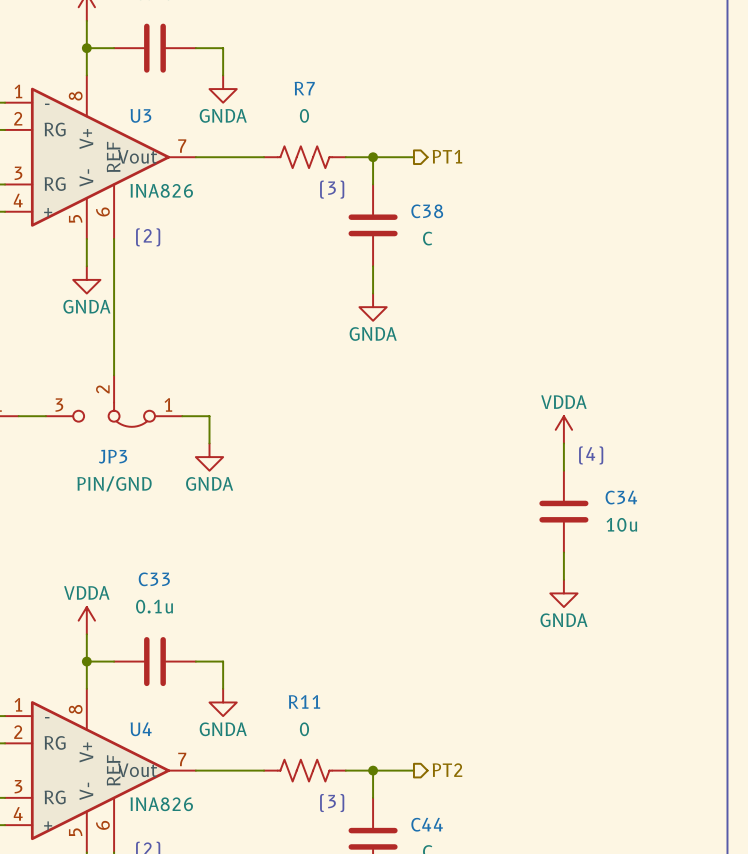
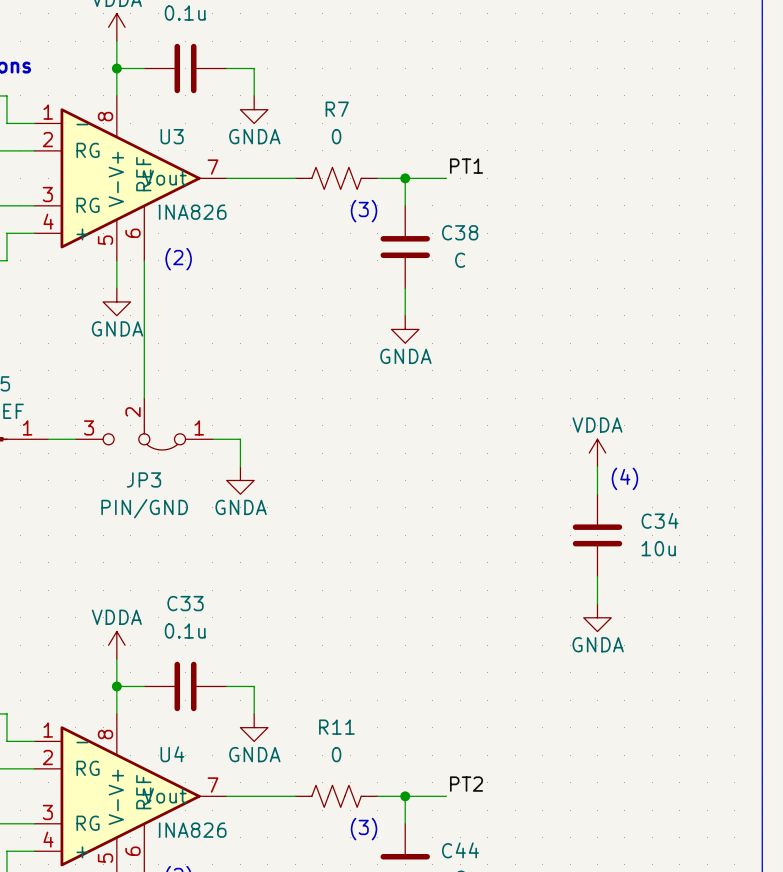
label: none -> PT1 (466, 166)
hierarchical label: PT1 (447, 156) -> none
label: none -> PT2 (466, 784)
hierarchical label: PT2 (447, 770) -> none

